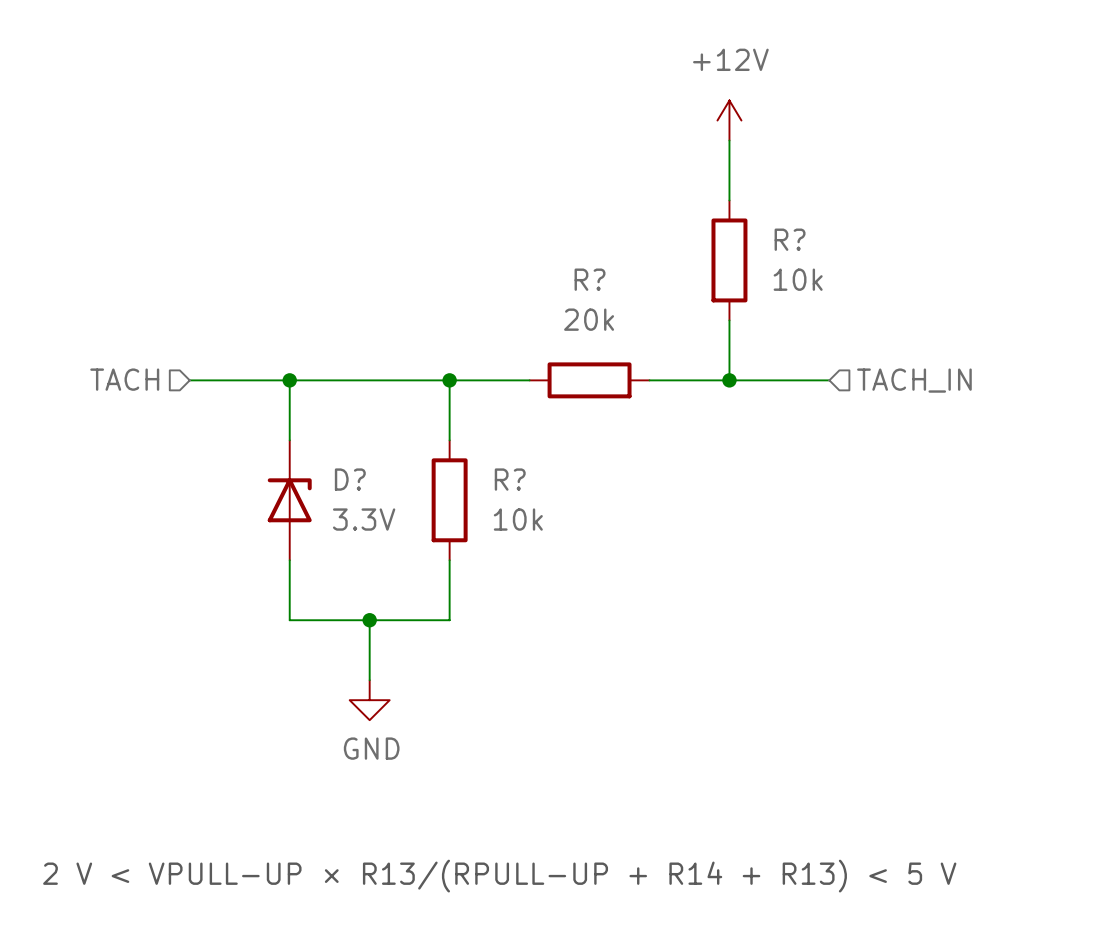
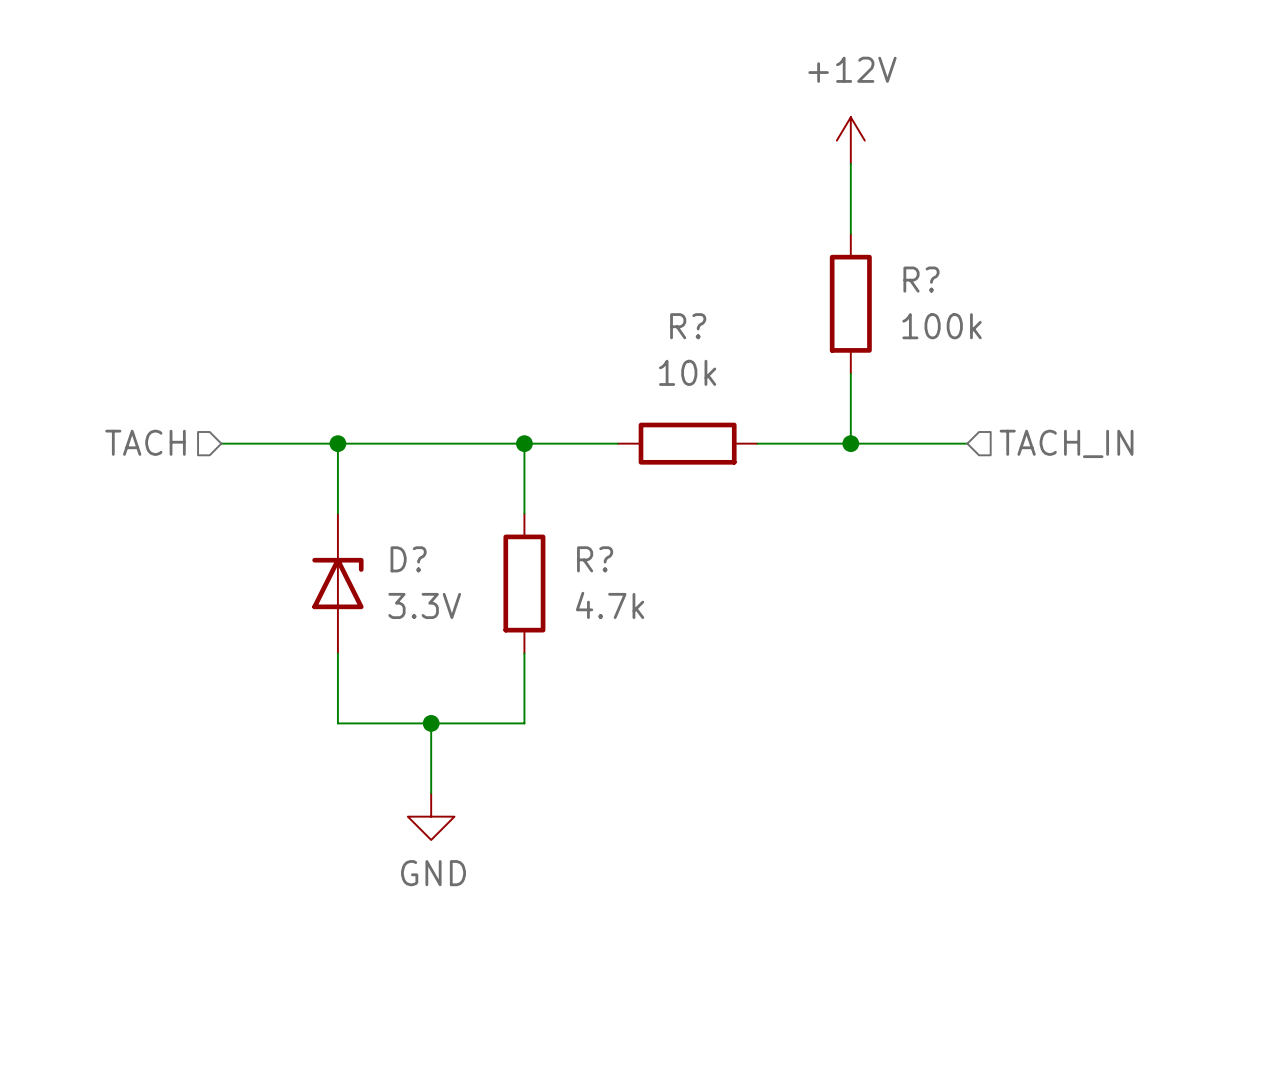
R? value: 10k (798, 279) -> 100k (942, 326)
R? value: 20k (589, 319) -> 10k (687, 372)
R? value: 10k (518, 519) -> 4.7k (610, 605)
text: 2 V < VPULL-UP × R13/(RPULL-UP + R14 + R13) < 5 V (499, 876) -> none

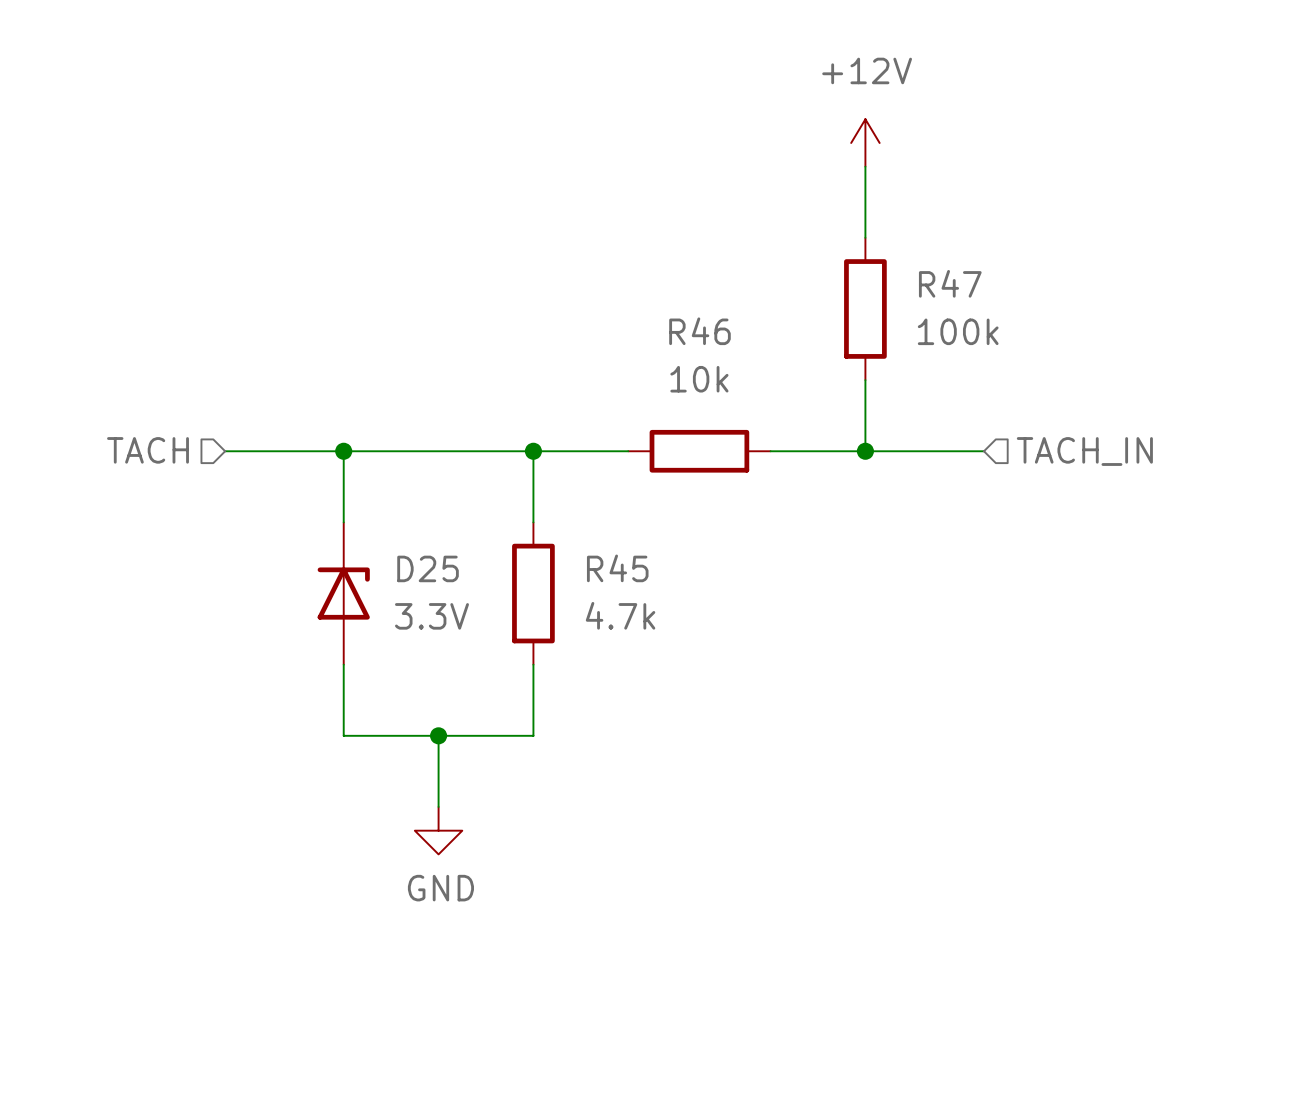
R? name: R? (921, 279) -> R47 (950, 283)
R? name: R? (688, 326) -> R46 (699, 331)
D? name: D? (408, 559) -> D25 (428, 568)
R? name: R? (595, 559) -> R45 (617, 568)

